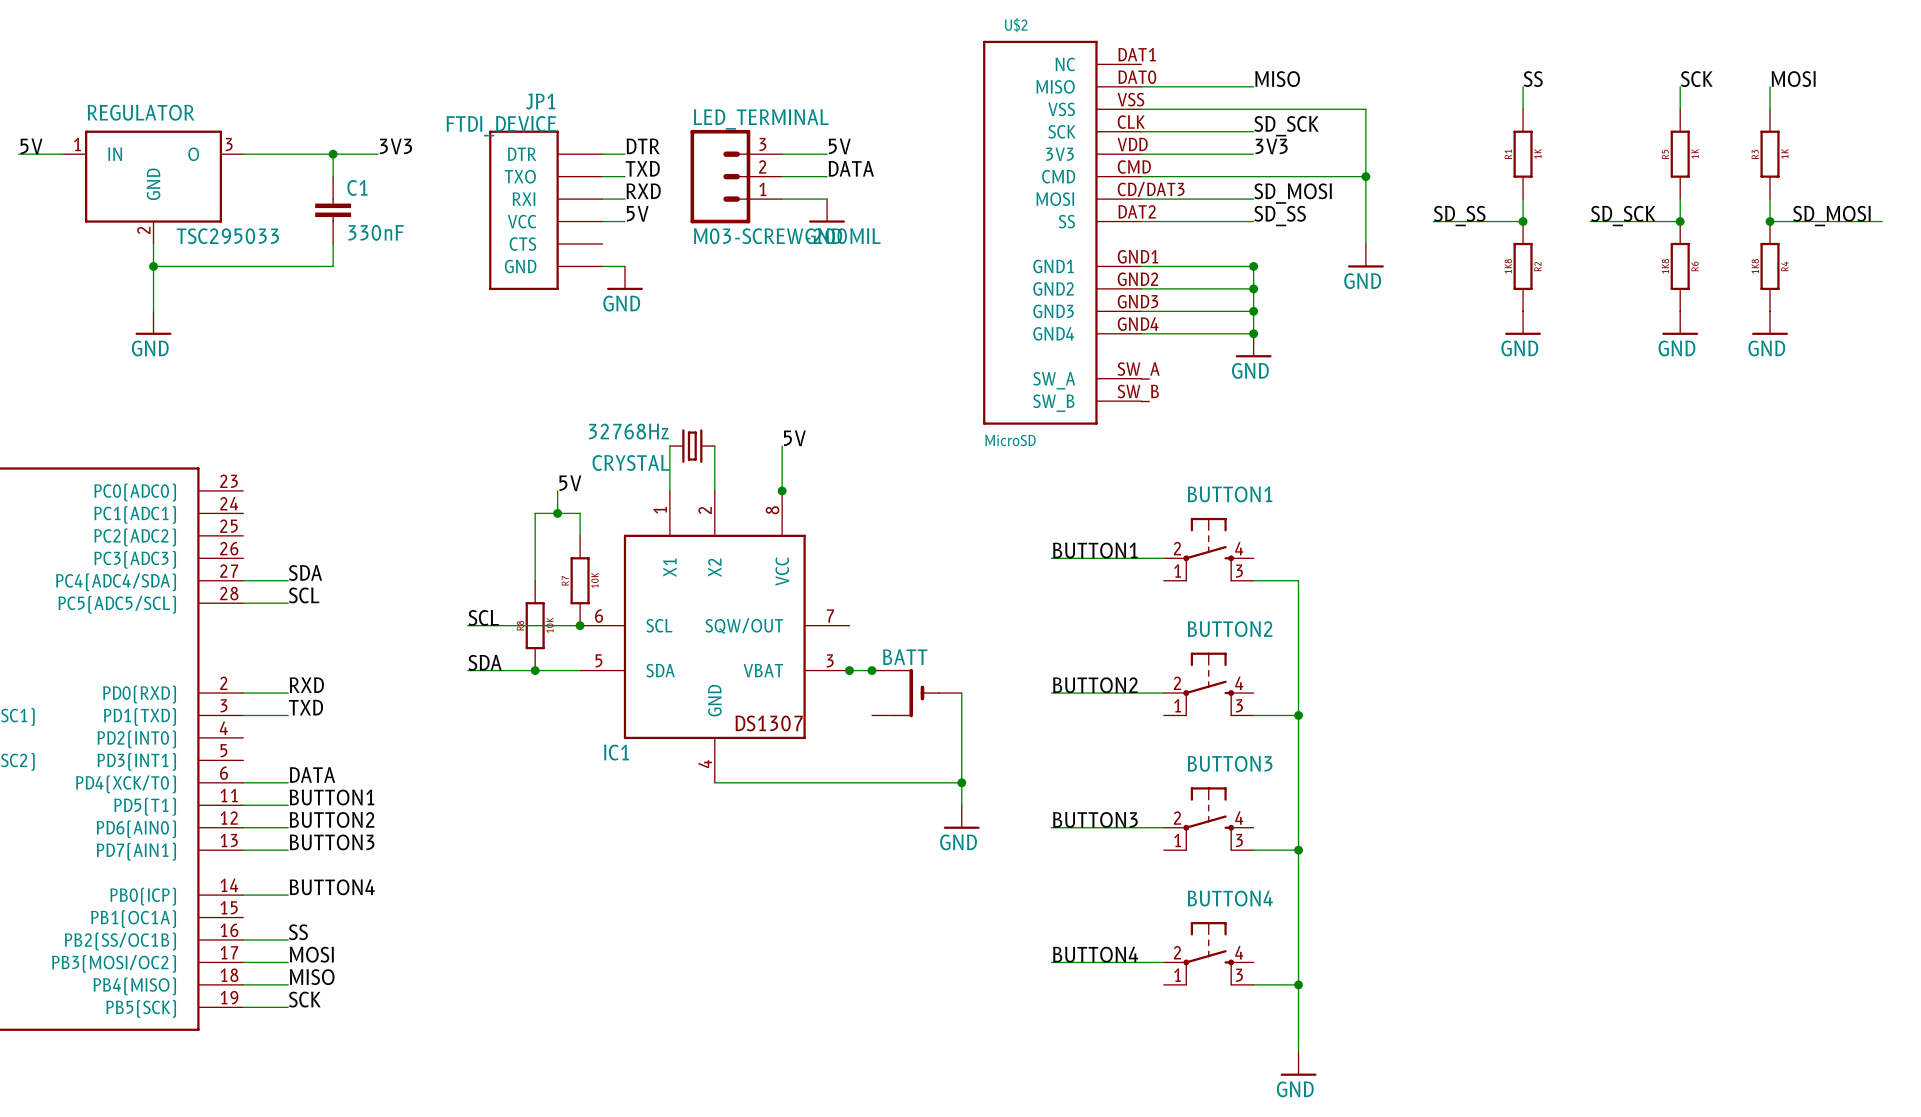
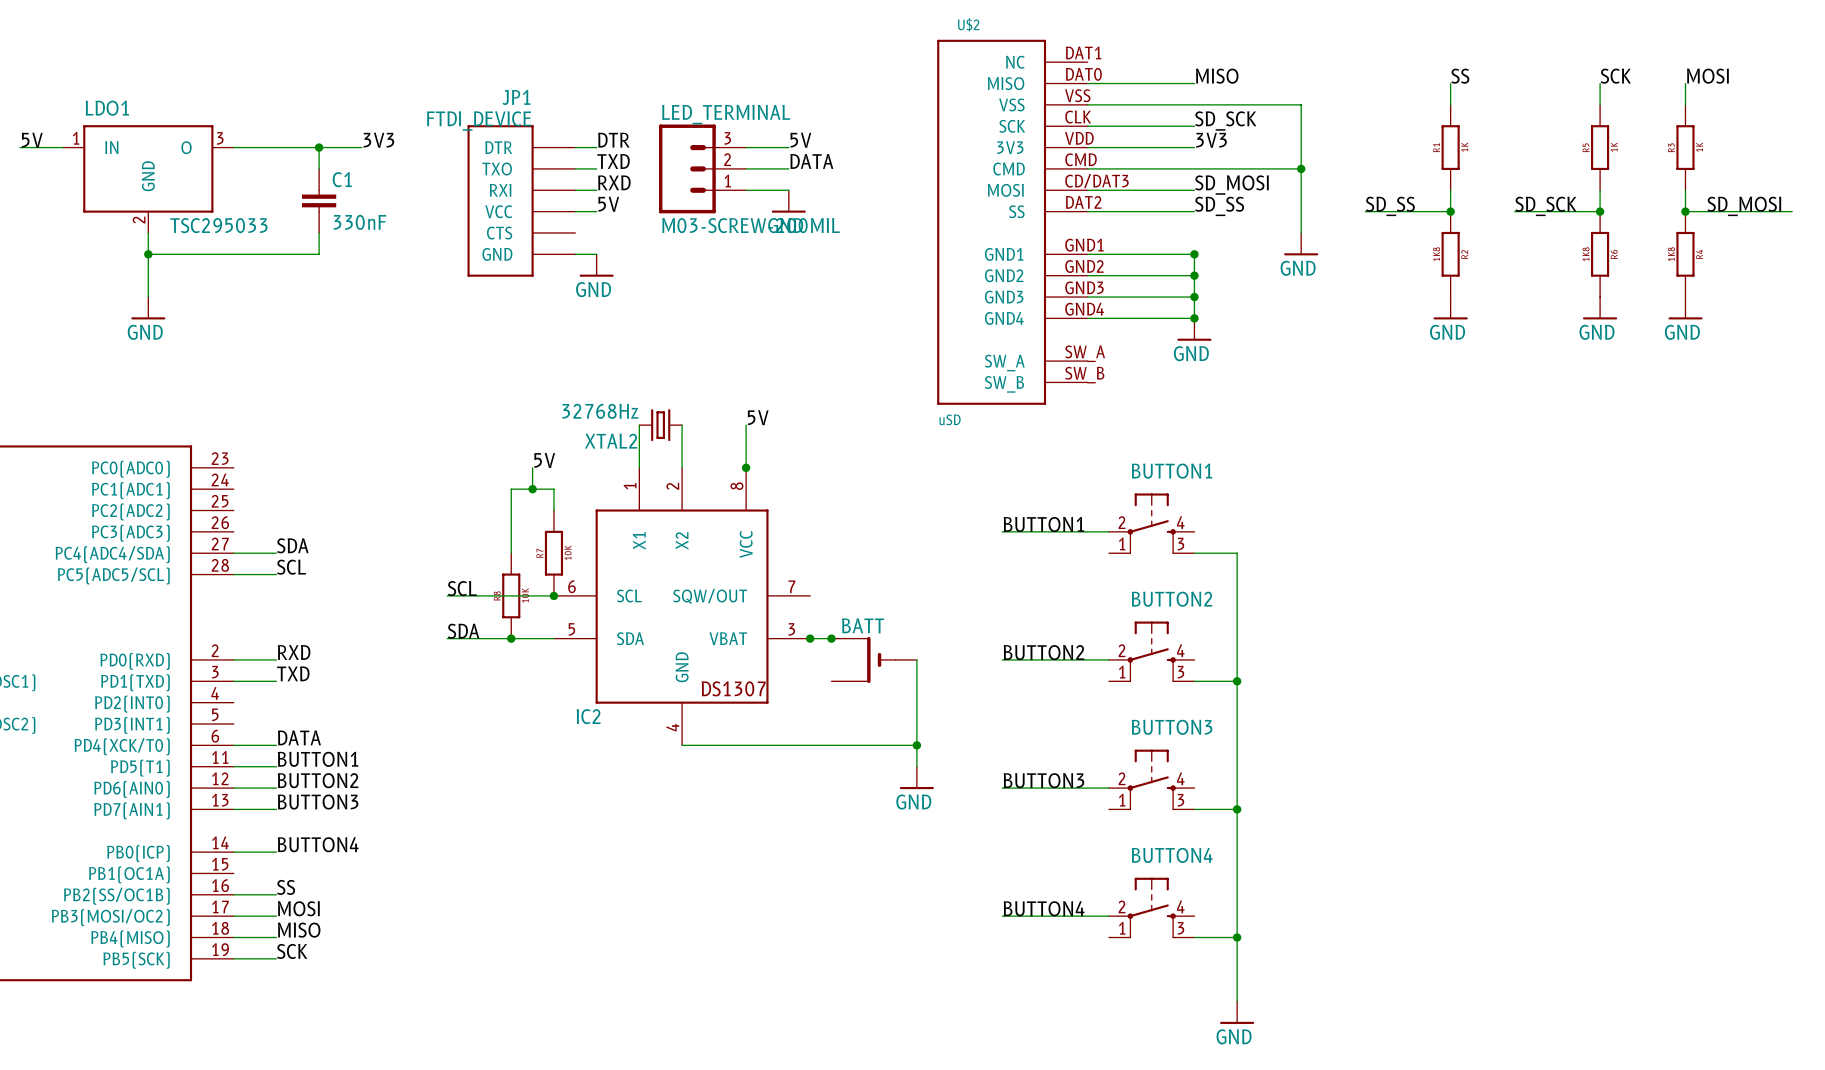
REGULATOR name: REGULATOR (141, 112) -> LDO1 (107, 108)
U$2 value: MicroSD (1010, 440) -> uSD (950, 419)
CRYSTAL name: CRYSTAL (630, 462) -> XTAL2 (611, 441)
IC1 name: IC1 (616, 752) -> IC2 (588, 716)

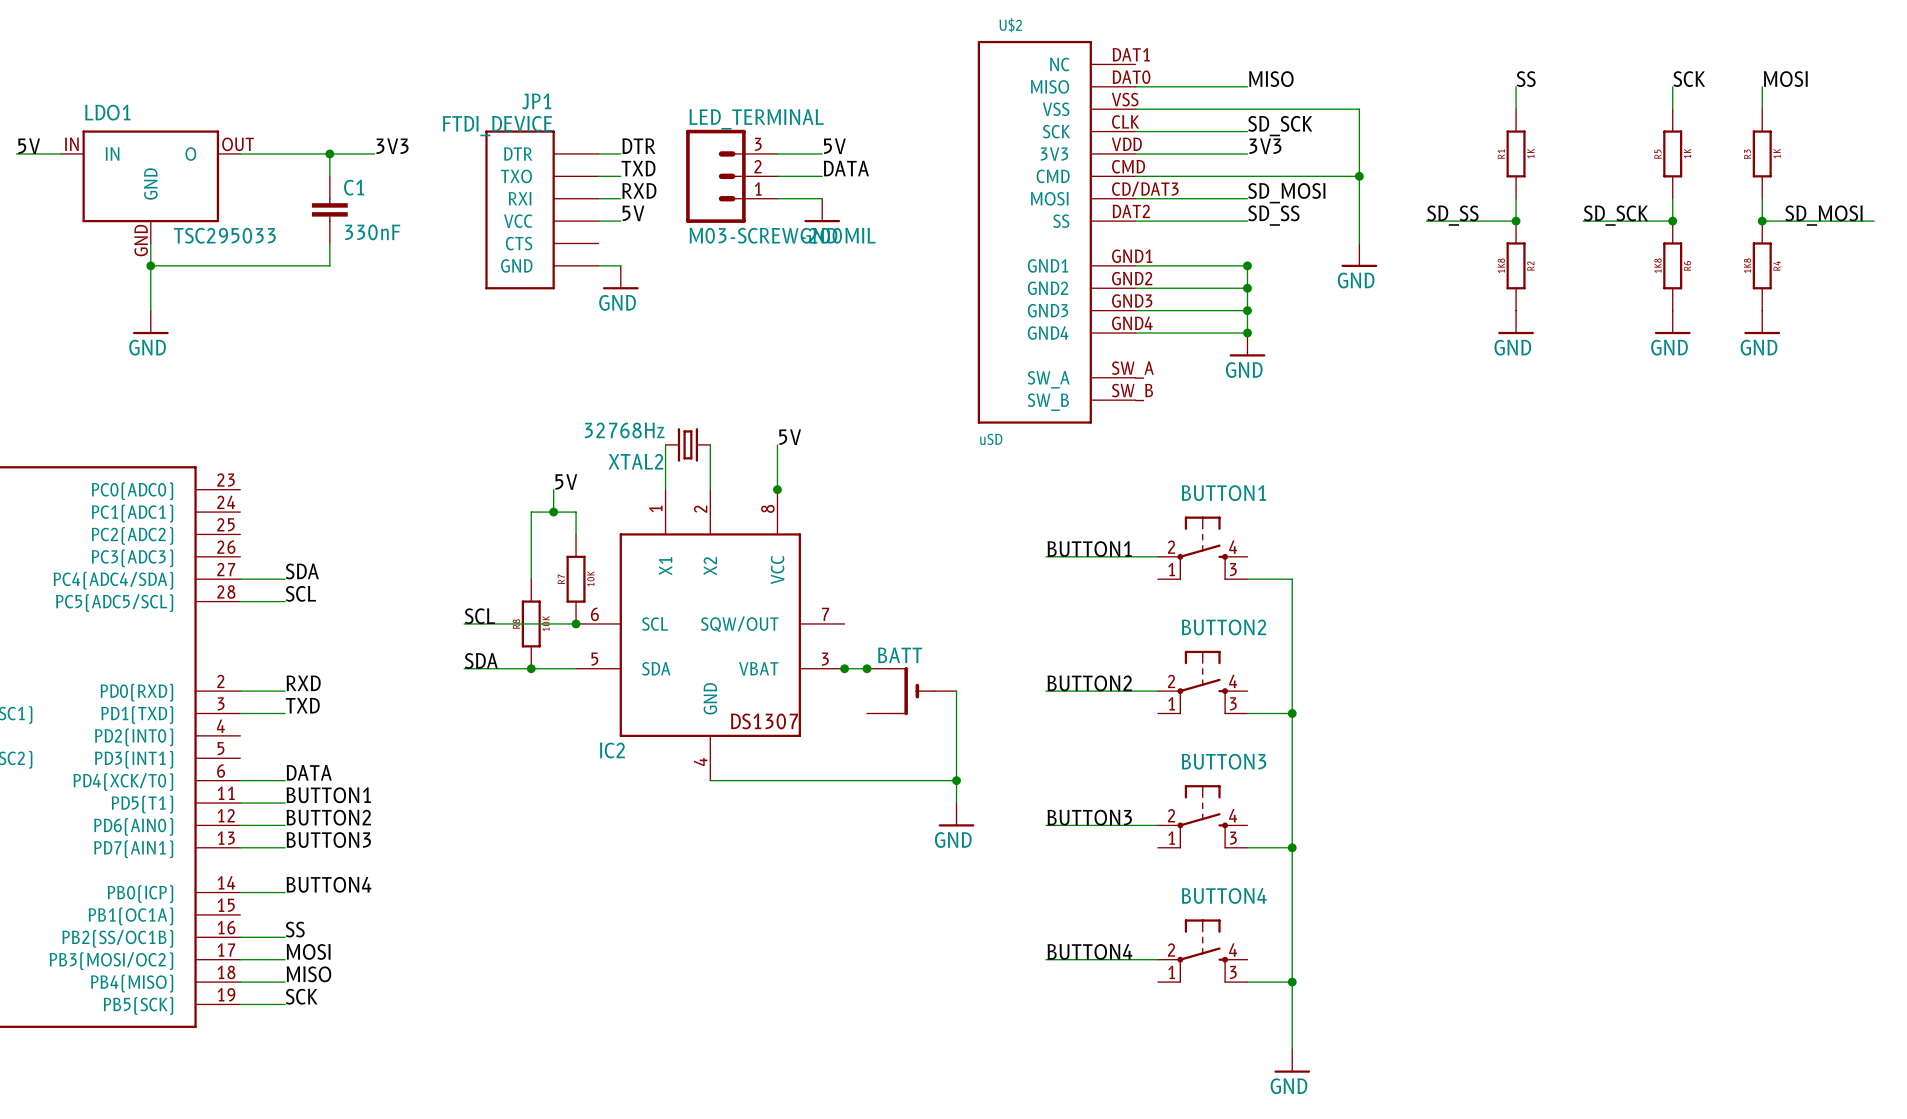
LDO1 pin number: 1 (76, 138) -> IN (71, 144)
LDO1 pin number: 3 (220, 138) -> OUT (238, 144)
LDO1 pin number: 2 (139, 220) -> GND (141, 240)

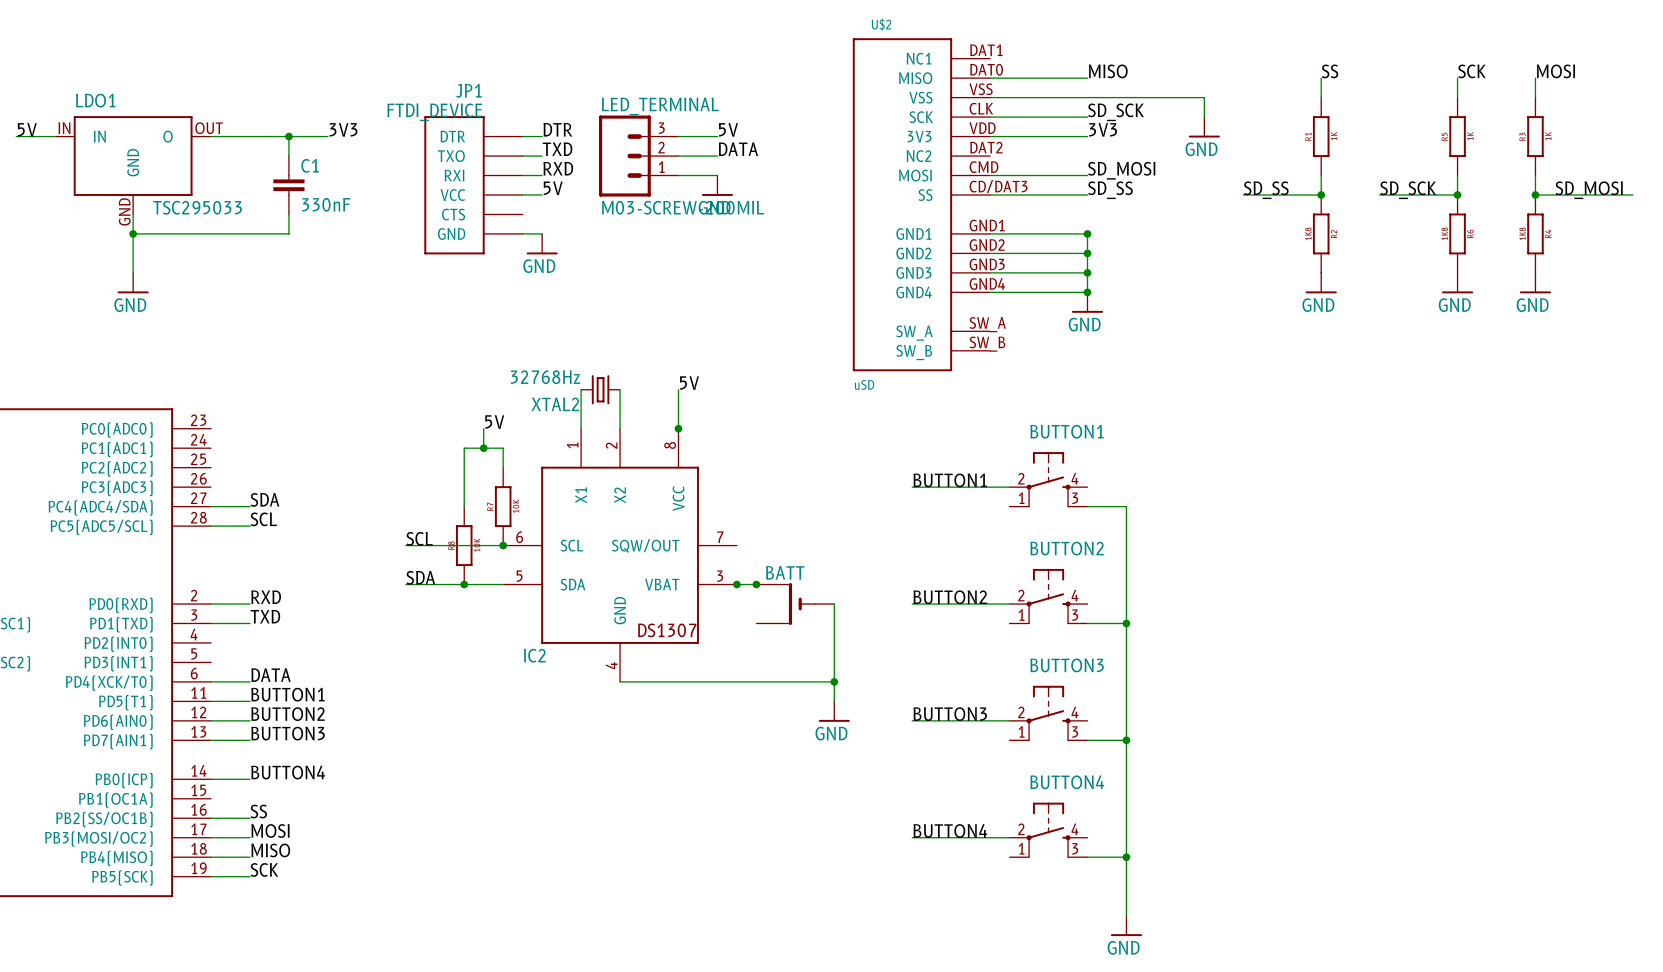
U$2 pin name: NC (1059, 64) -> NC1 (919, 58)
wire: (1359, 109) (1359, 243) -> (1184, 97) (1204, 97) (1204, 117)
U$2 pin number: CMD (1128, 166) -> DAT2 (986, 147)
U$2 pin name: CMD (1053, 176) -> NC2 (919, 156)
wire: (1135, 176) (1359, 176) -> none
junction: (1359, 176) -> none
U$2 pin number: CD/DAT3 (1145, 189) -> CMD (983, 167)
U$2 pin number: DAT2 (1131, 211) -> CD/DAT3 (998, 186)
power symbol position: GND (1359, 255) -> GND (1204, 127)

